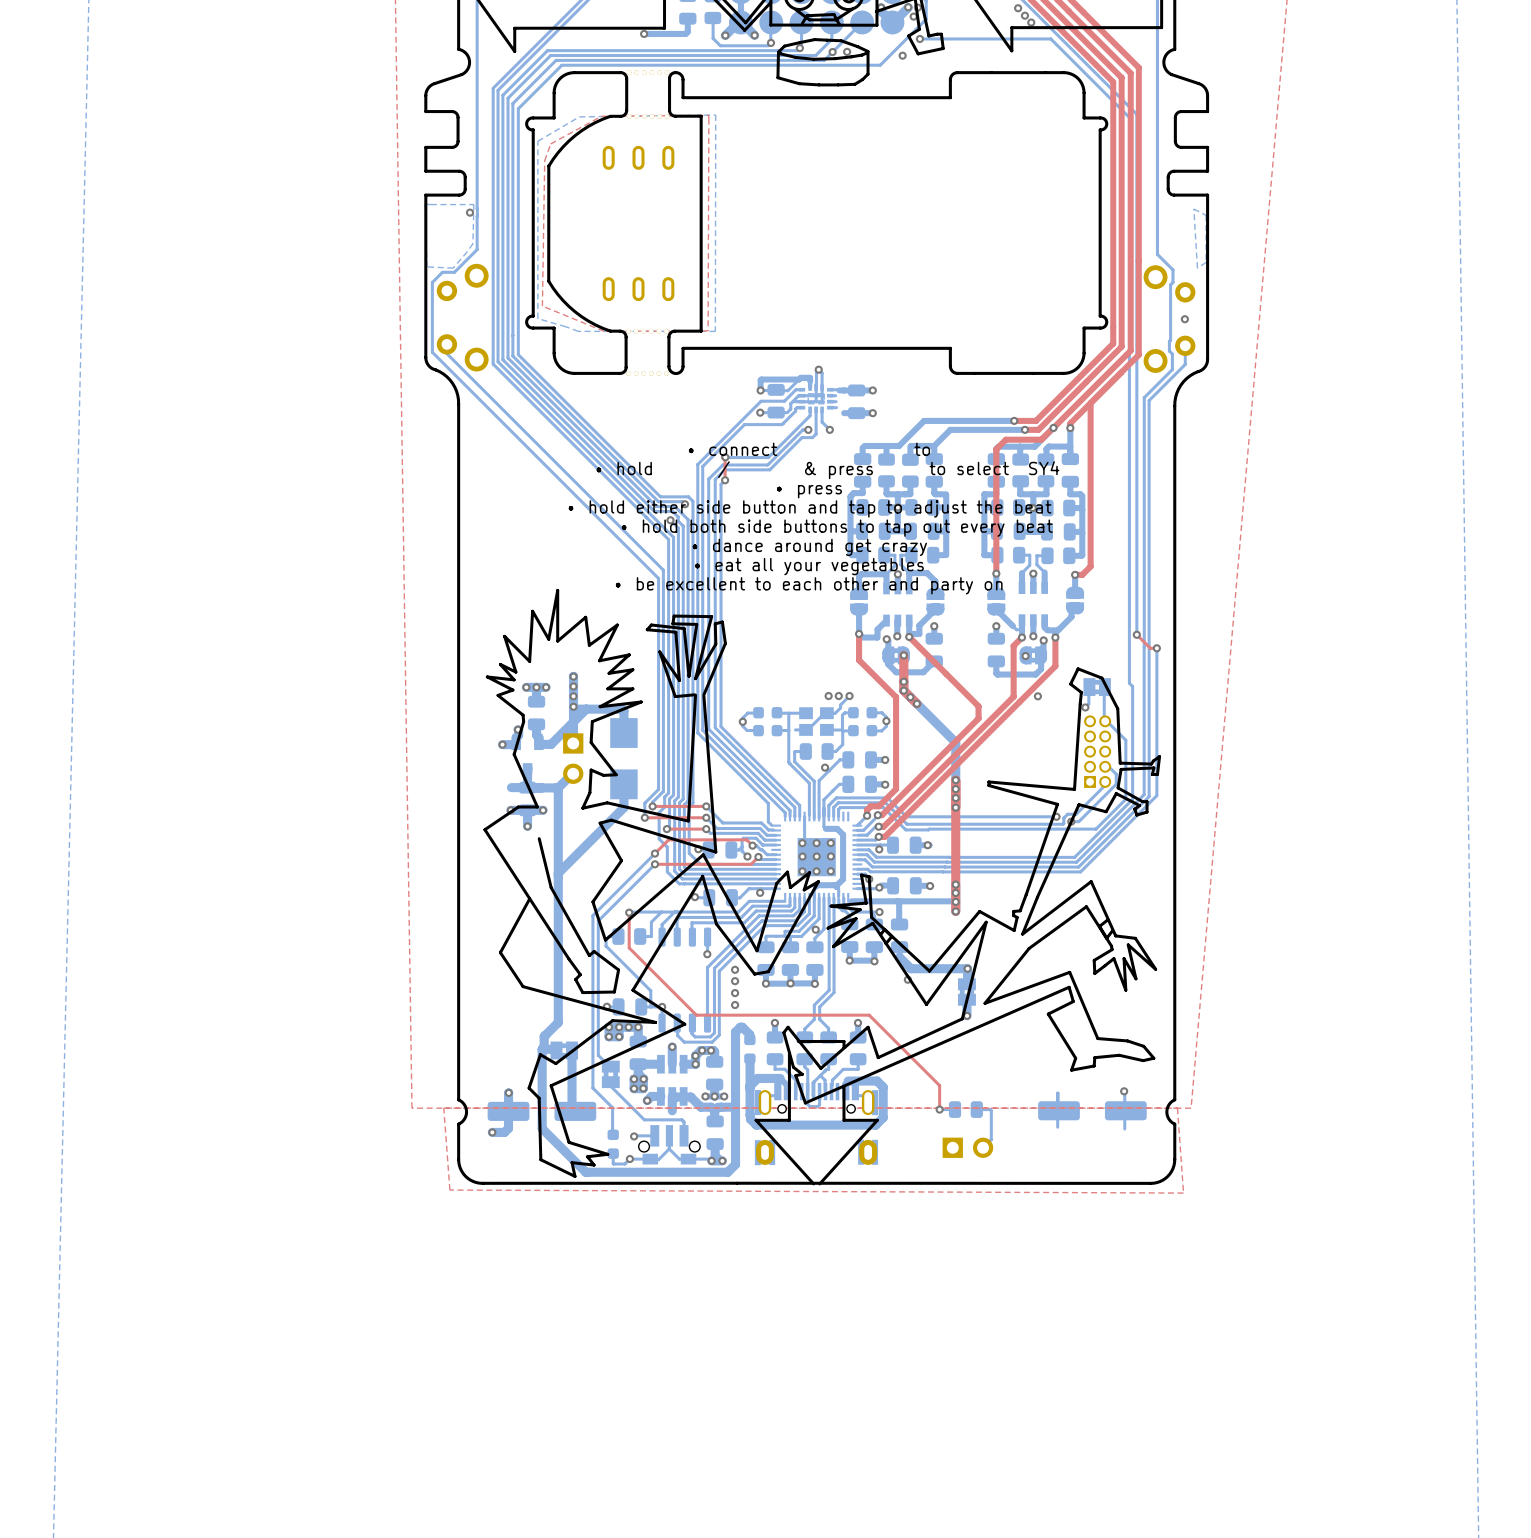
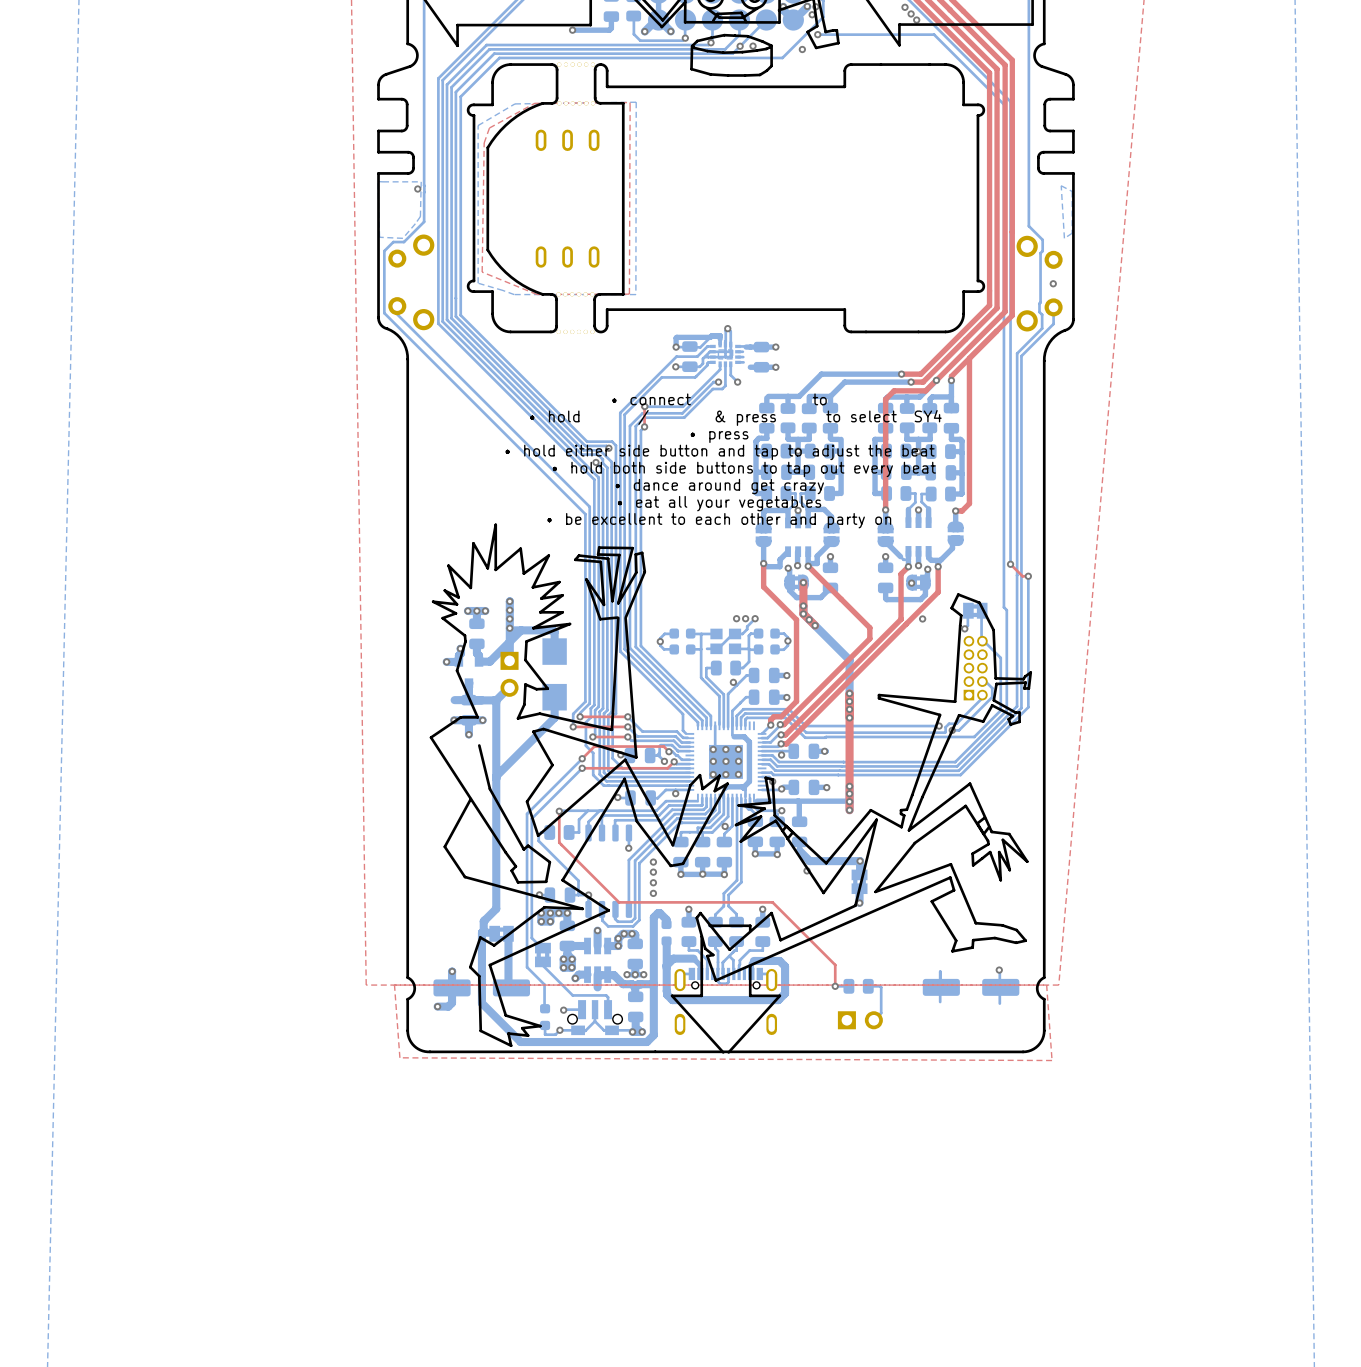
part footprint: [754, 1082, 879, 1166] -> [674, 967, 778, 1036]

